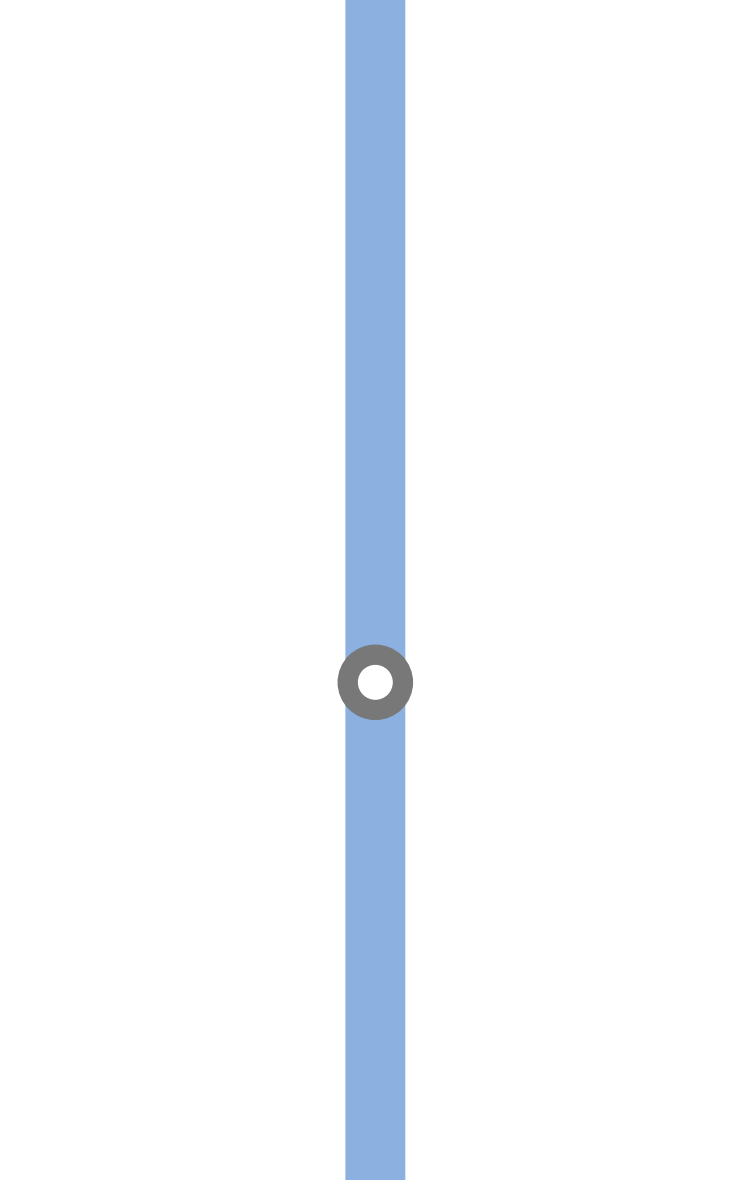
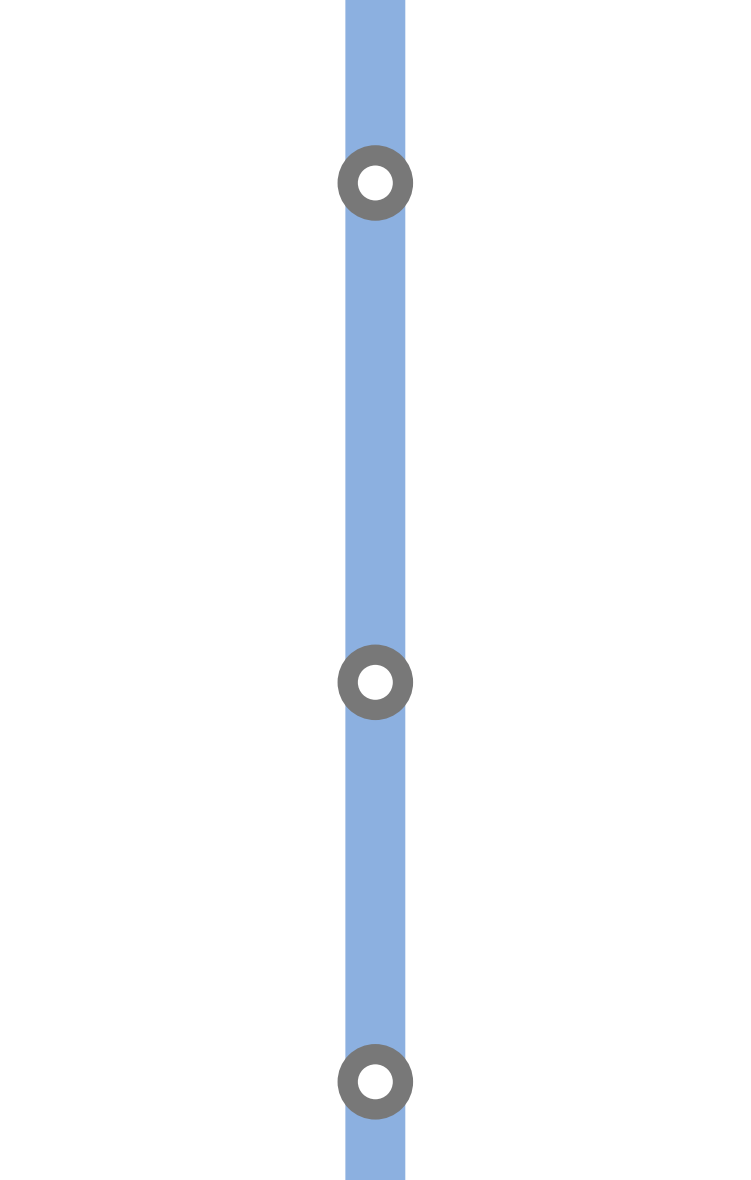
via: none -> (375, 182)
via: none -> (375, 1081)

